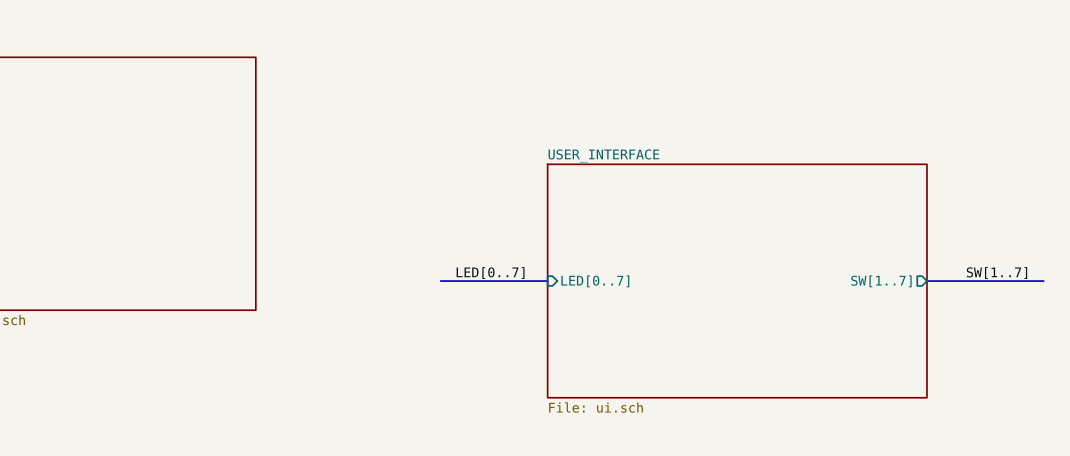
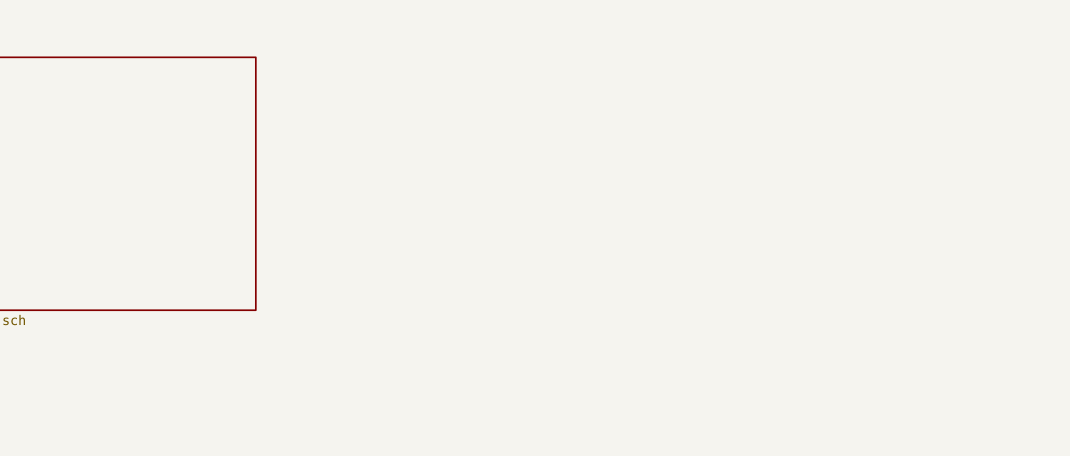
label: LED[0..7] (490, 273) -> none
label: SW[1..7] (996, 273) -> none
bus: (440, 281) (547, 281) -> none
sheet pin: LED[0..7] (595, 281) -> none
sheet USER_INTERFACE: File: ui.sch (737, 281) -> none
sheet pin: SW[1..7] (881, 281) -> none
bus: (926, 281) (1043, 281) -> none

